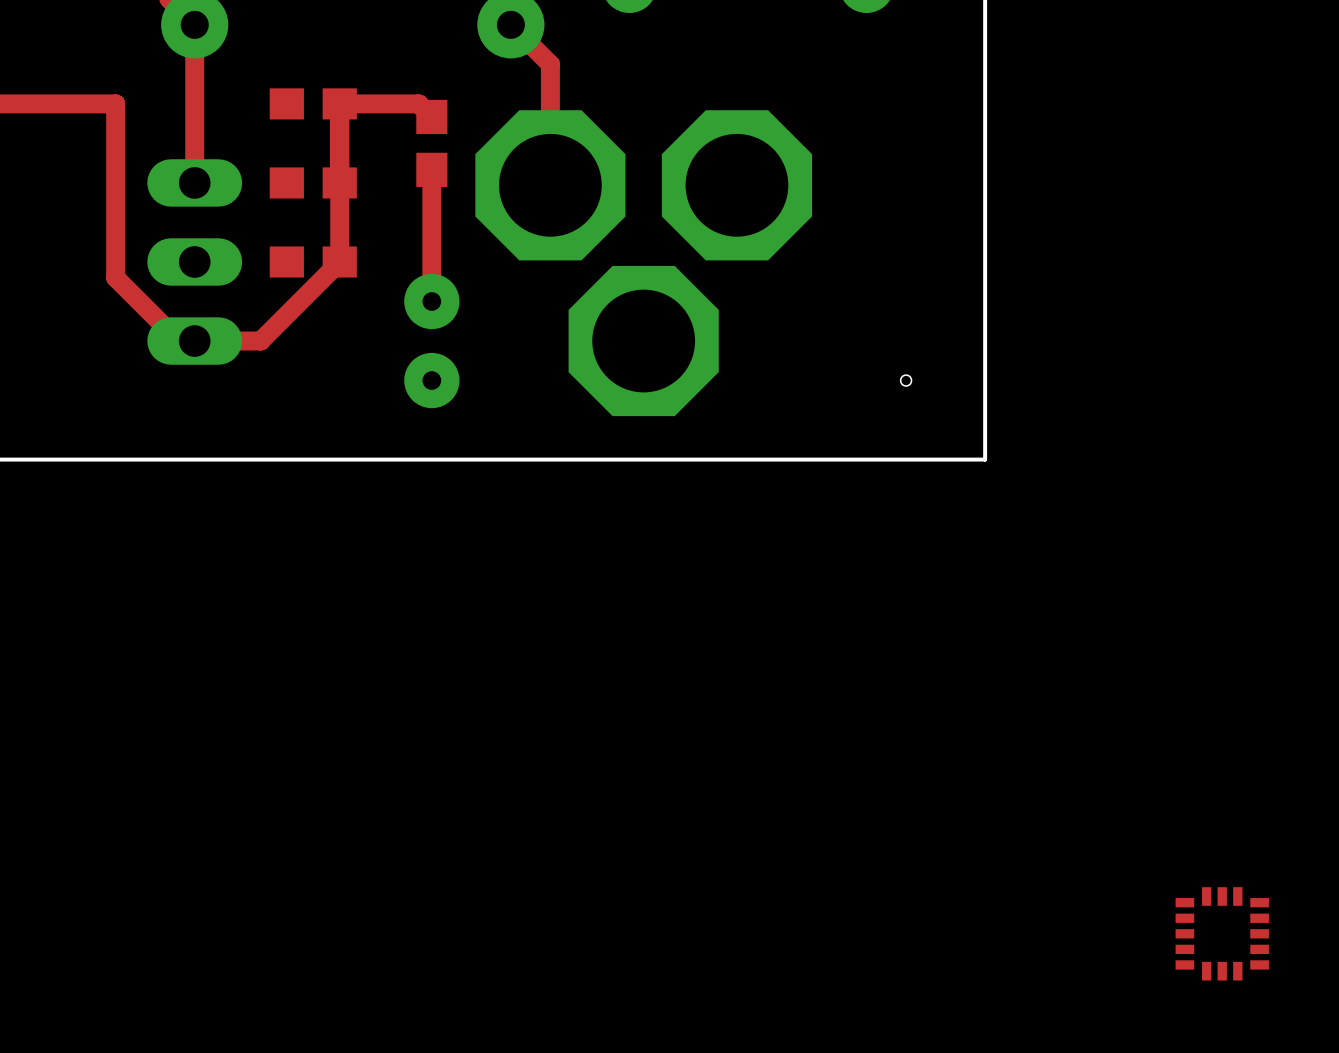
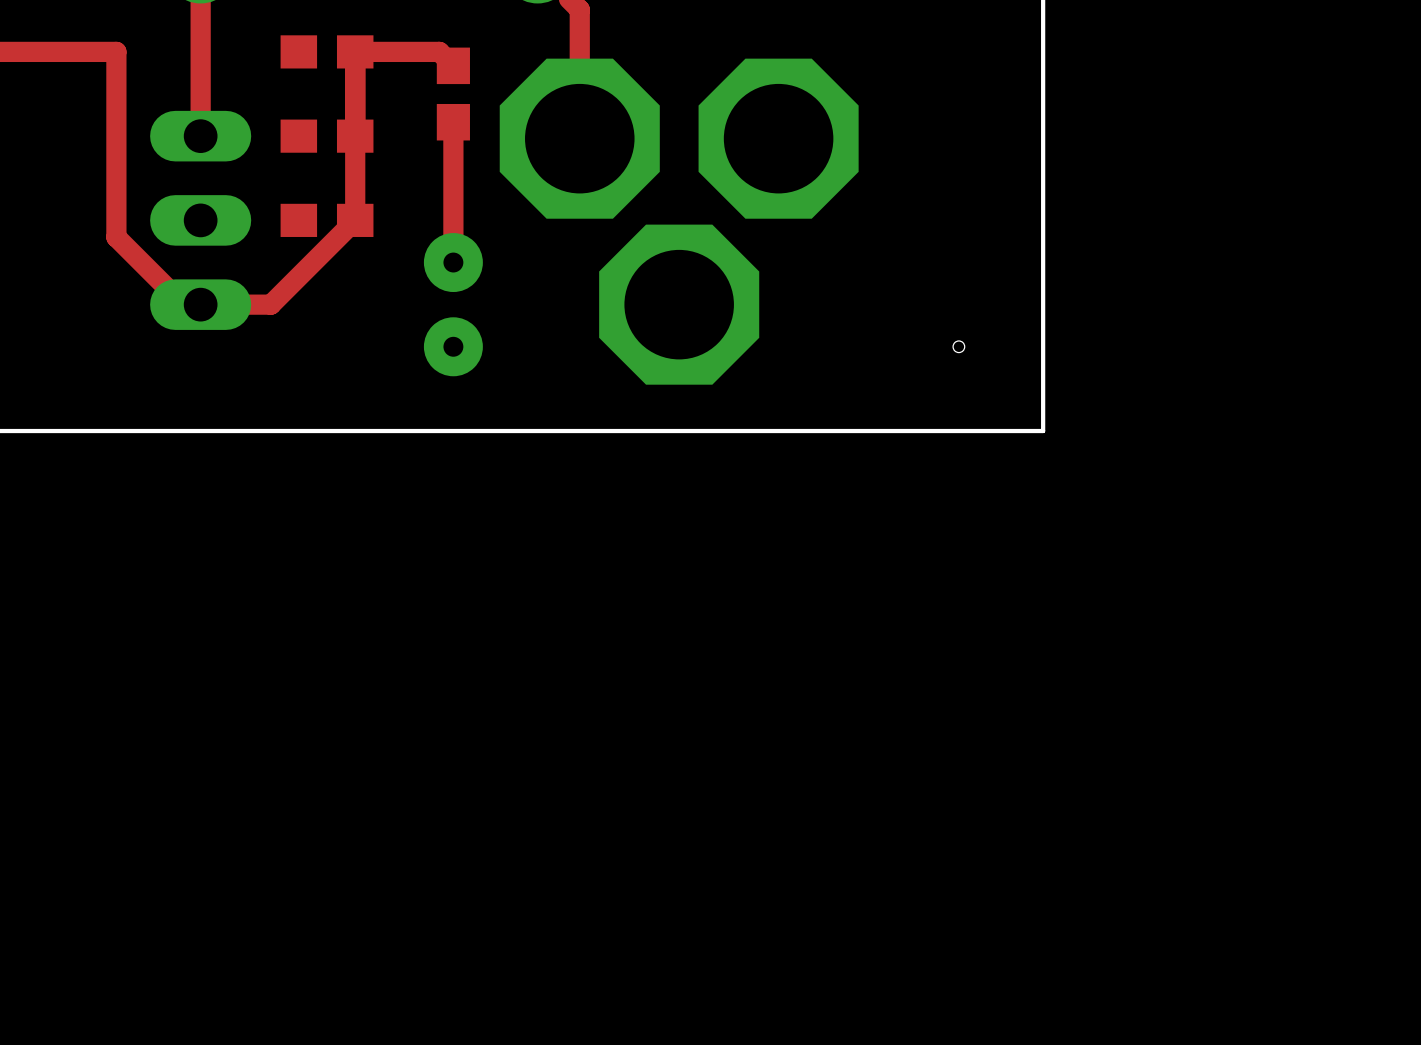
part: (1222, 933) -> none

